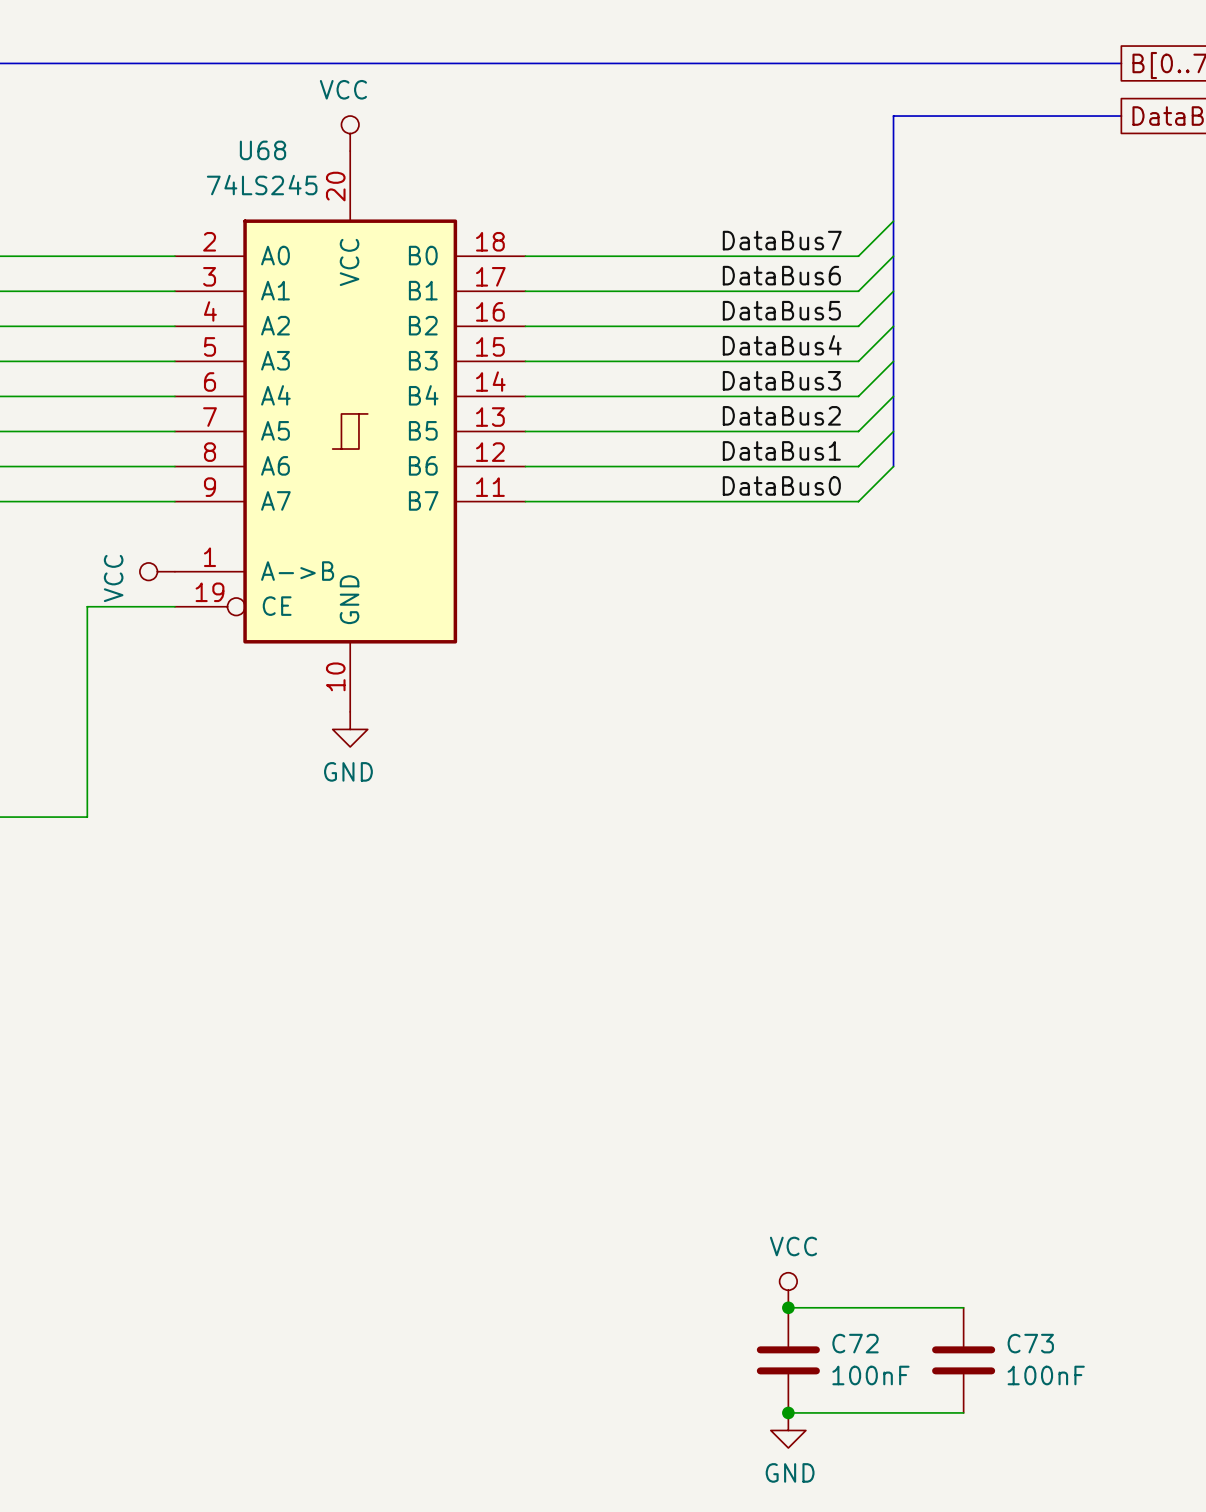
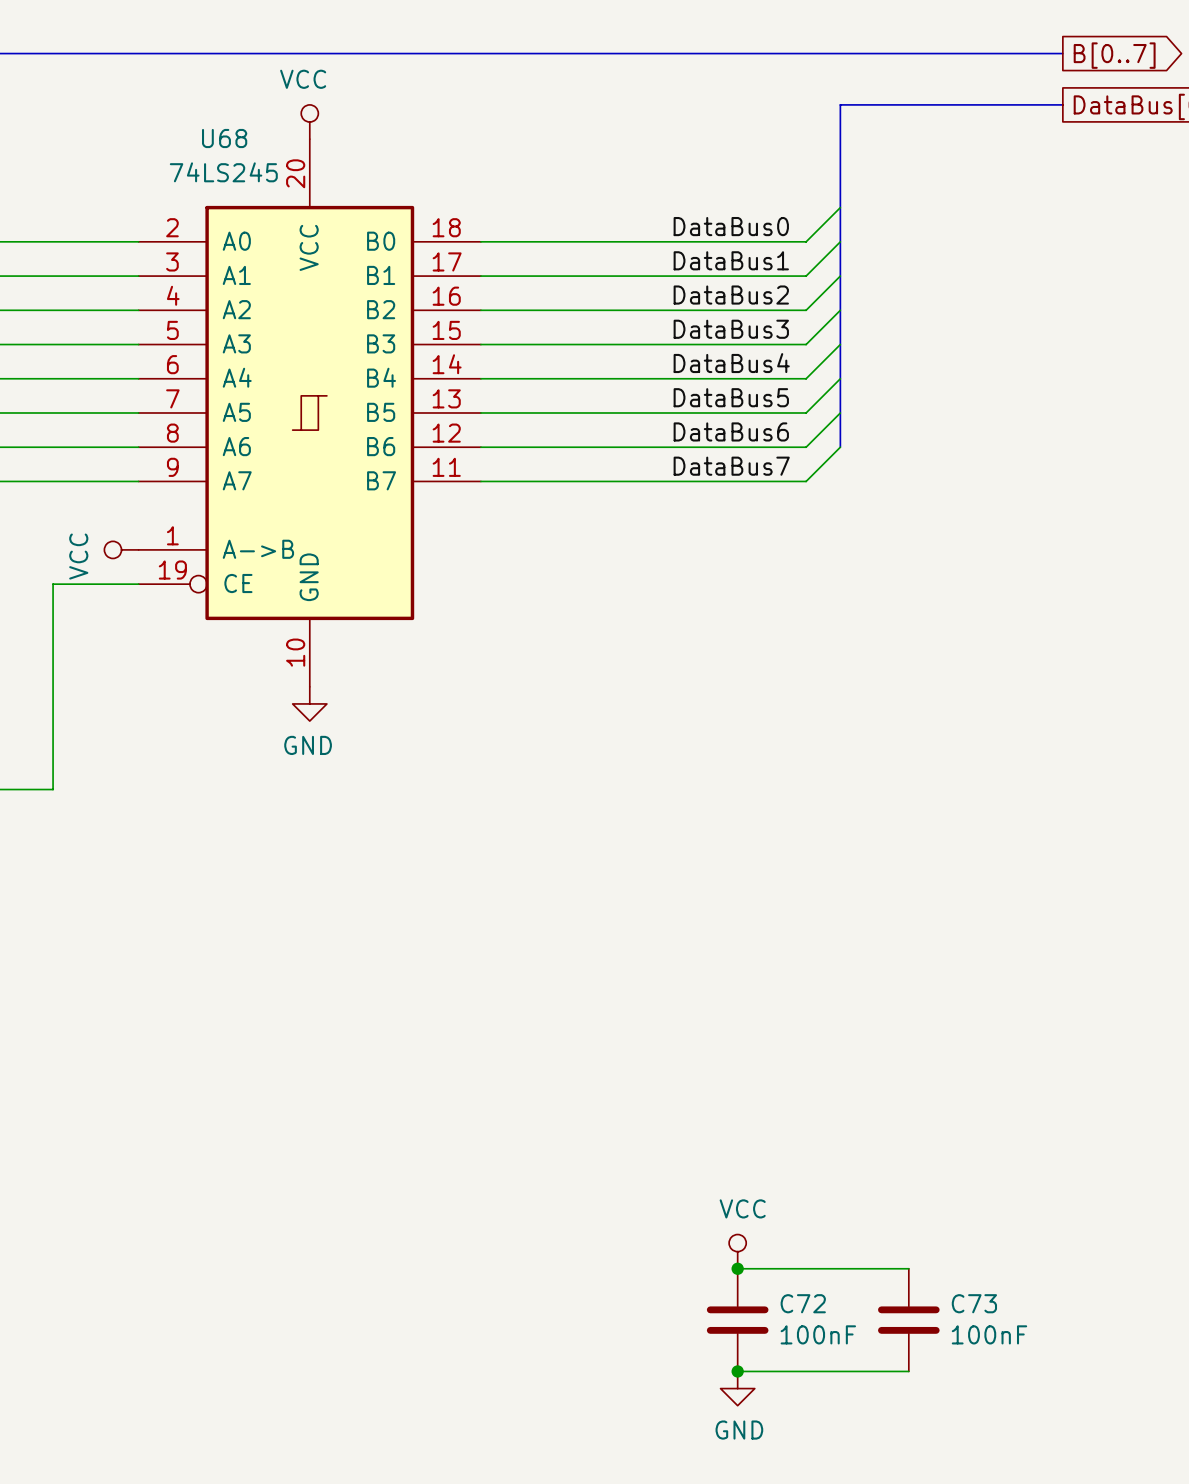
label: DataBus7 (782, 240) -> DataBus0 (731, 226)
label: DataBus6 (781, 275) -> DataBus1 (731, 260)
label: DataBus5 (781, 310) -> DataBus2 (731, 295)
label: DataBus4 (782, 345) -> DataBus3 (731, 329)
label: DataBus3 (781, 380) -> DataBus4 (731, 363)
label: DataBus2 (781, 415) -> DataBus5 (731, 397)
label: DataBus1 (781, 450) -> DataBus6 (731, 431)
label: DataBus0 (781, 485) -> DataBus7 (731, 466)

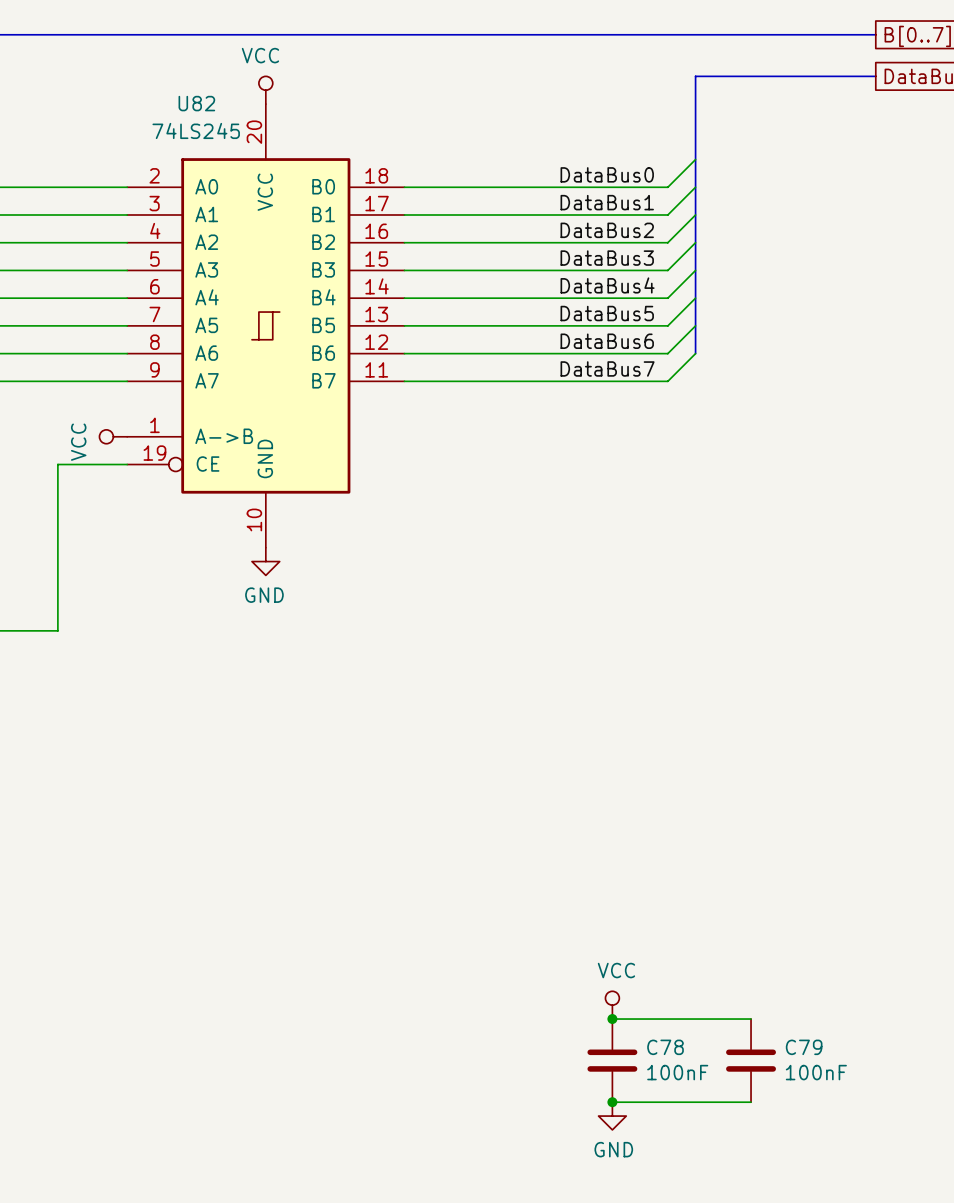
U68 name: U68 (224, 138) -> U82 (196, 103)
C72 name: C72 (803, 1303) -> C78 (665, 1047)
C73 name: C73 (974, 1303) -> C79 (804, 1047)

